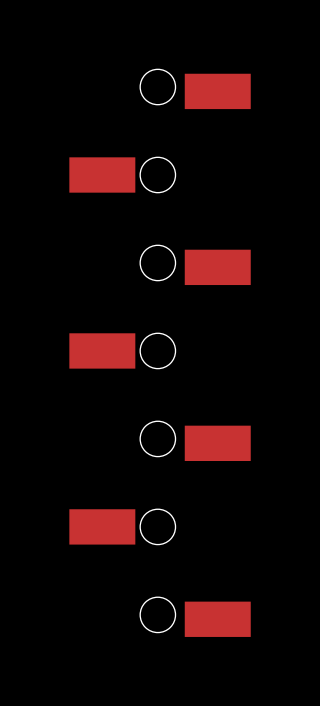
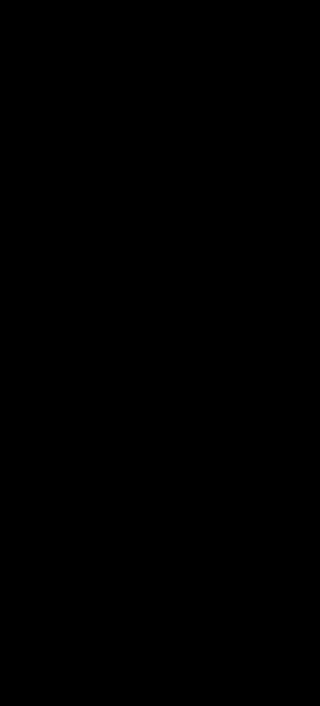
part: (160, 353) -> none

